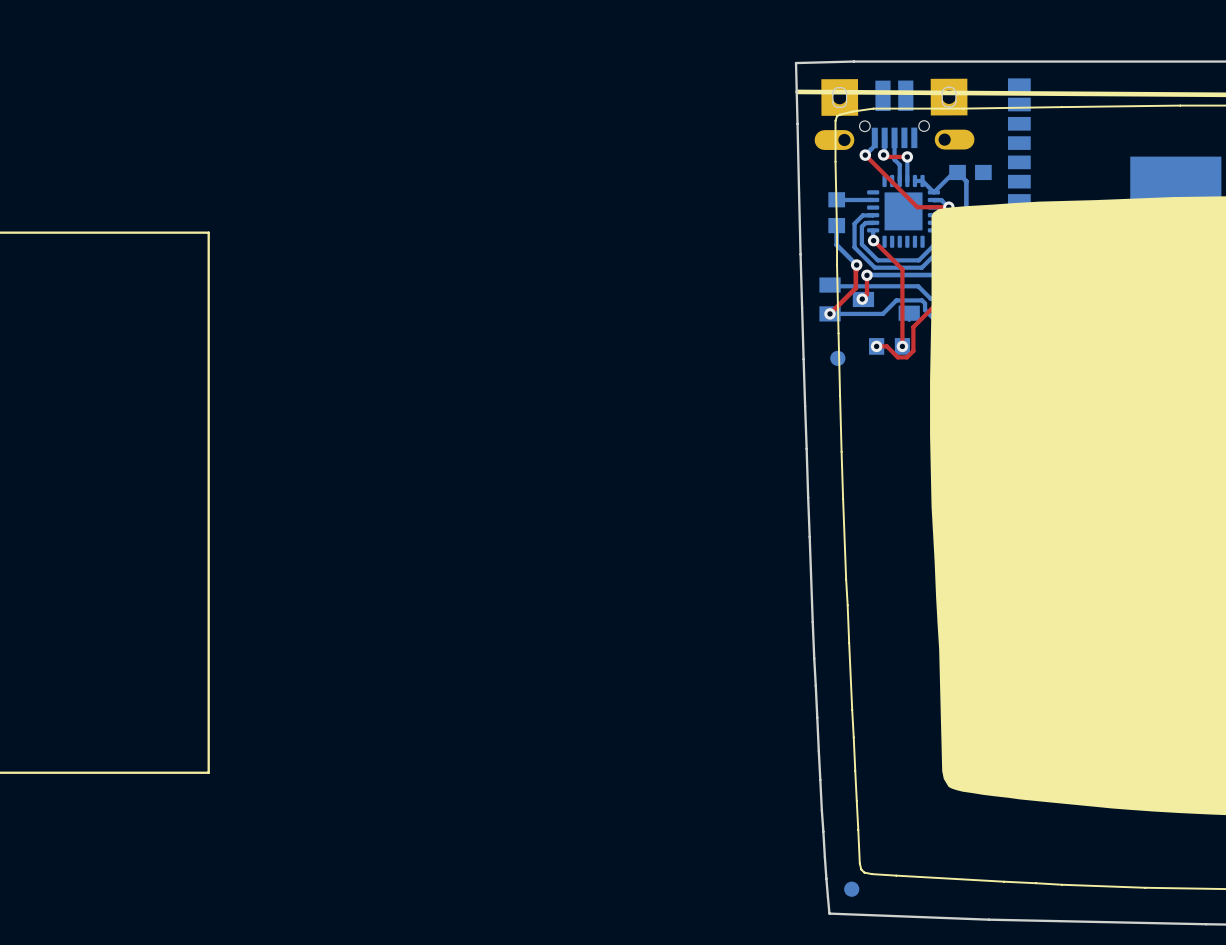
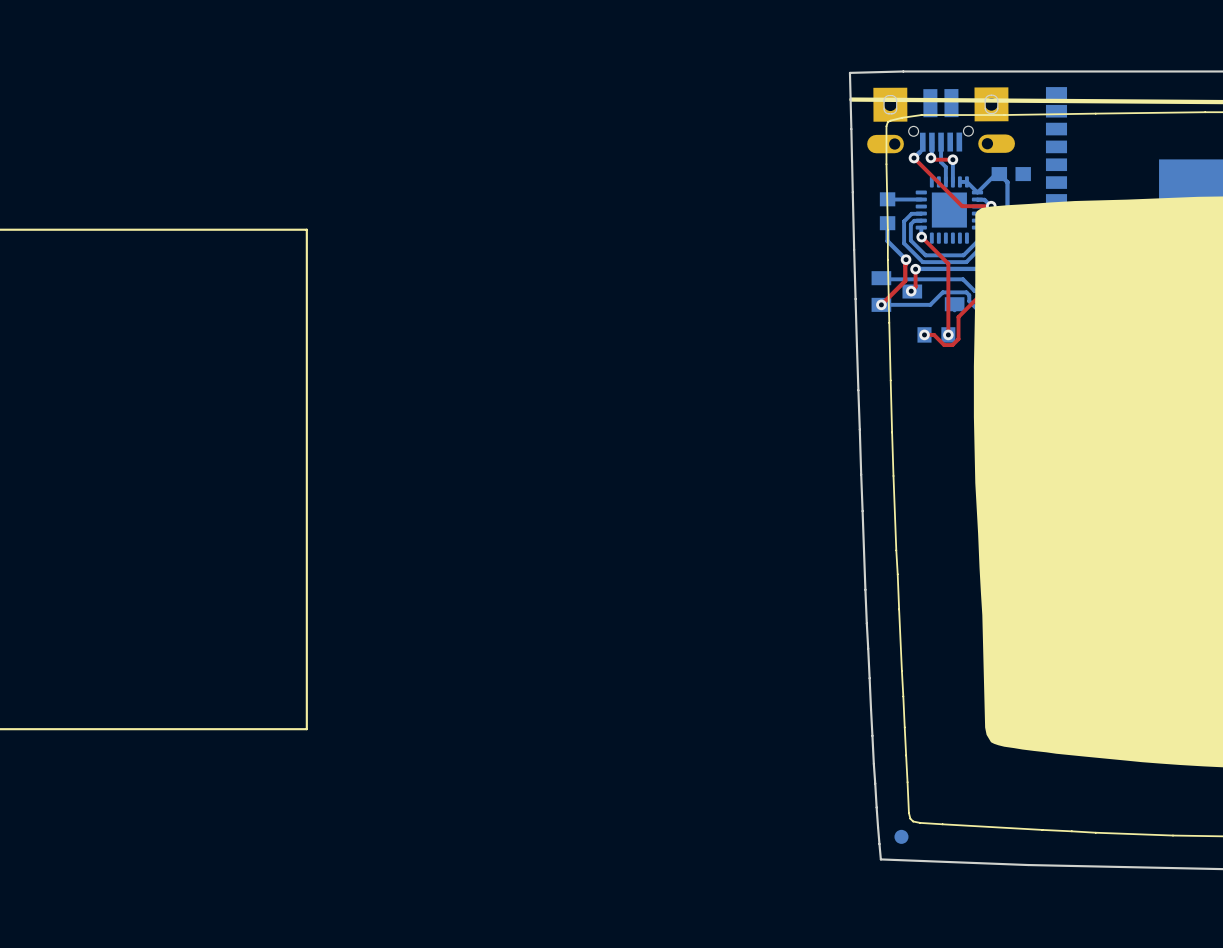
part: (837, 358) -> none

